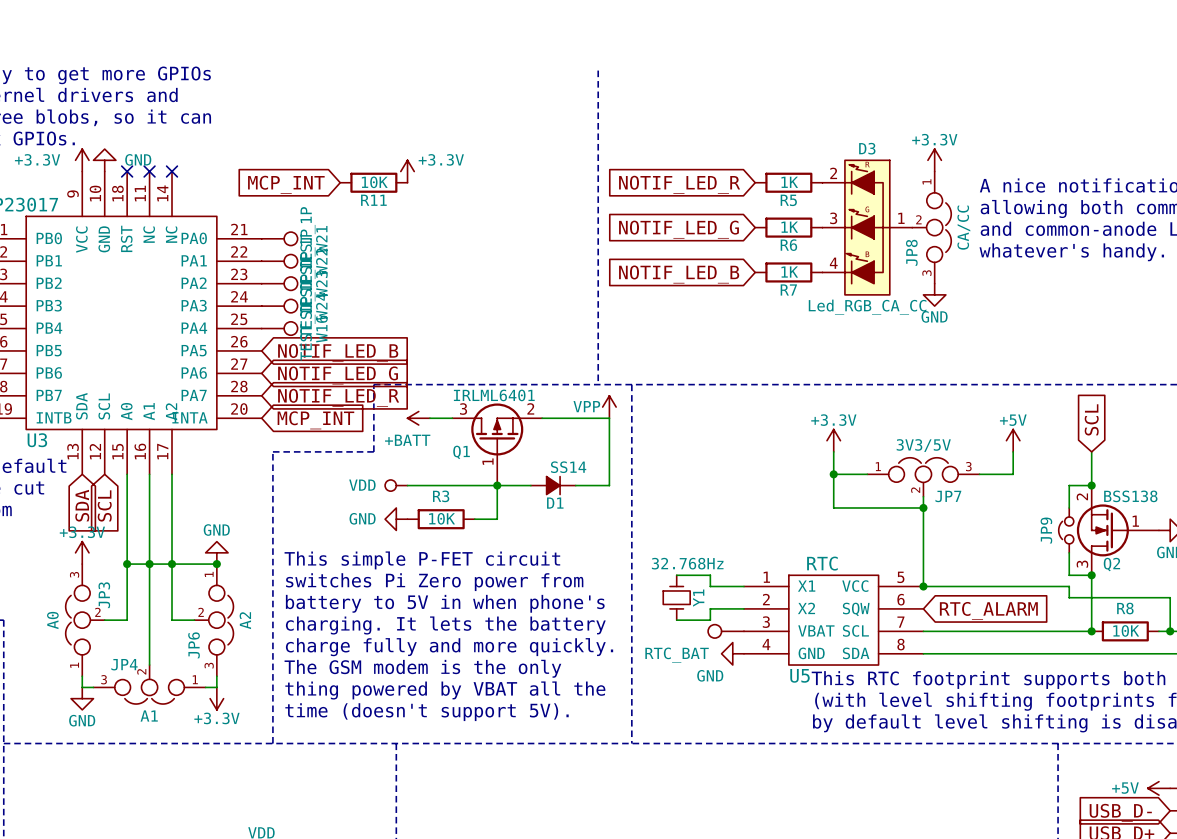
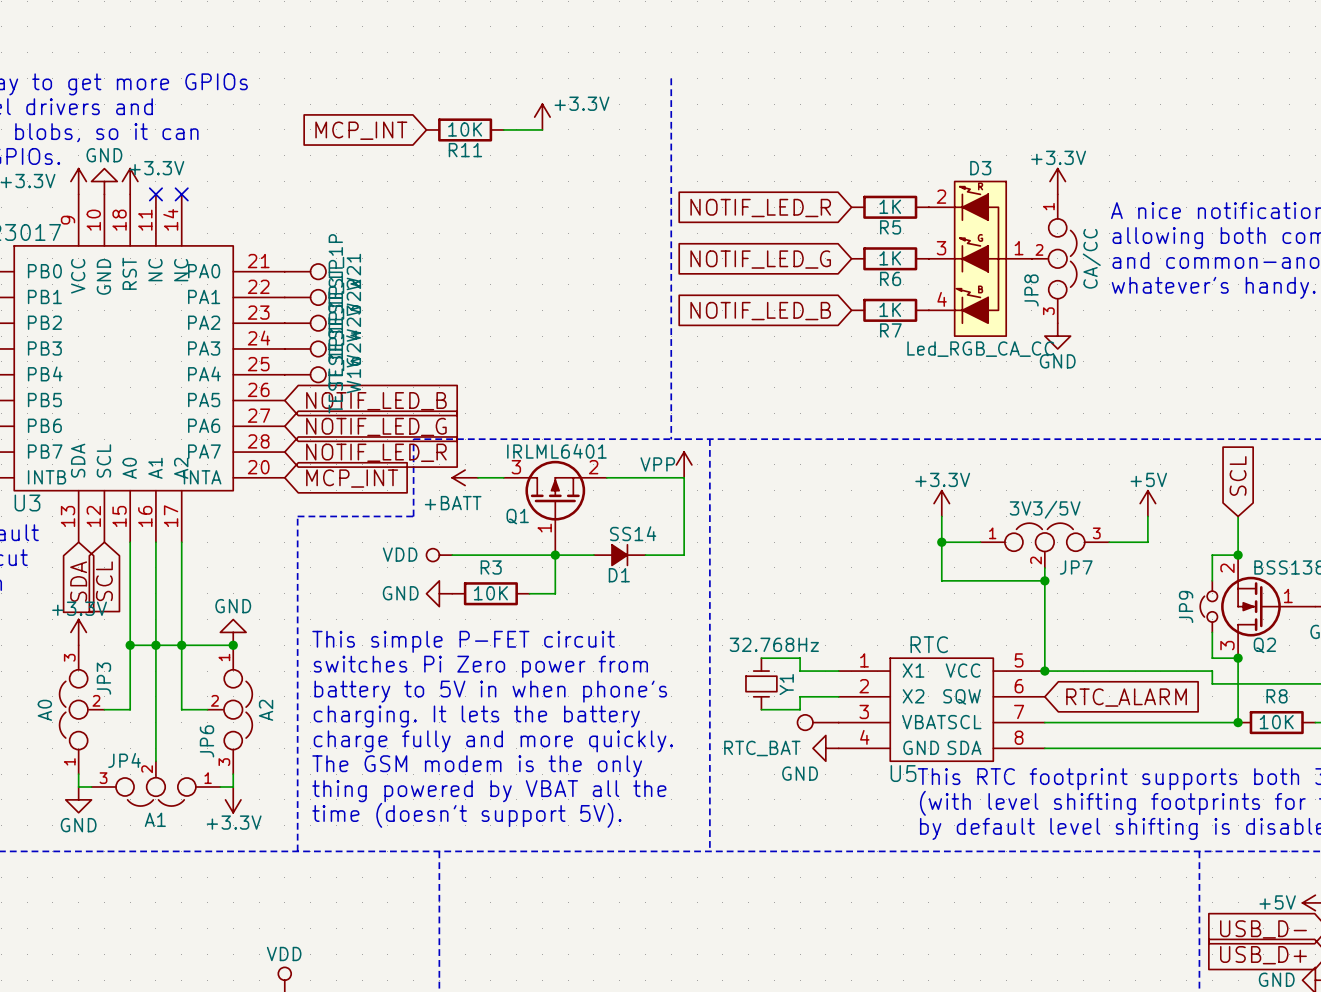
wire: none -> (503, 129) (542, 129)
power symbol text position: GND (138, 159) -> GND (104, 155)
power symbol: none -> +3.3V (130, 181)
no-connect mark: (127, 171) -> none
power symbol position: +3.3V (407, 171) -> +3.3V (542, 117)
R11 position: (373, 182) -> (465, 129)
global label position: MCP_INT (286, 184) -> MCP_INT (361, 130)

